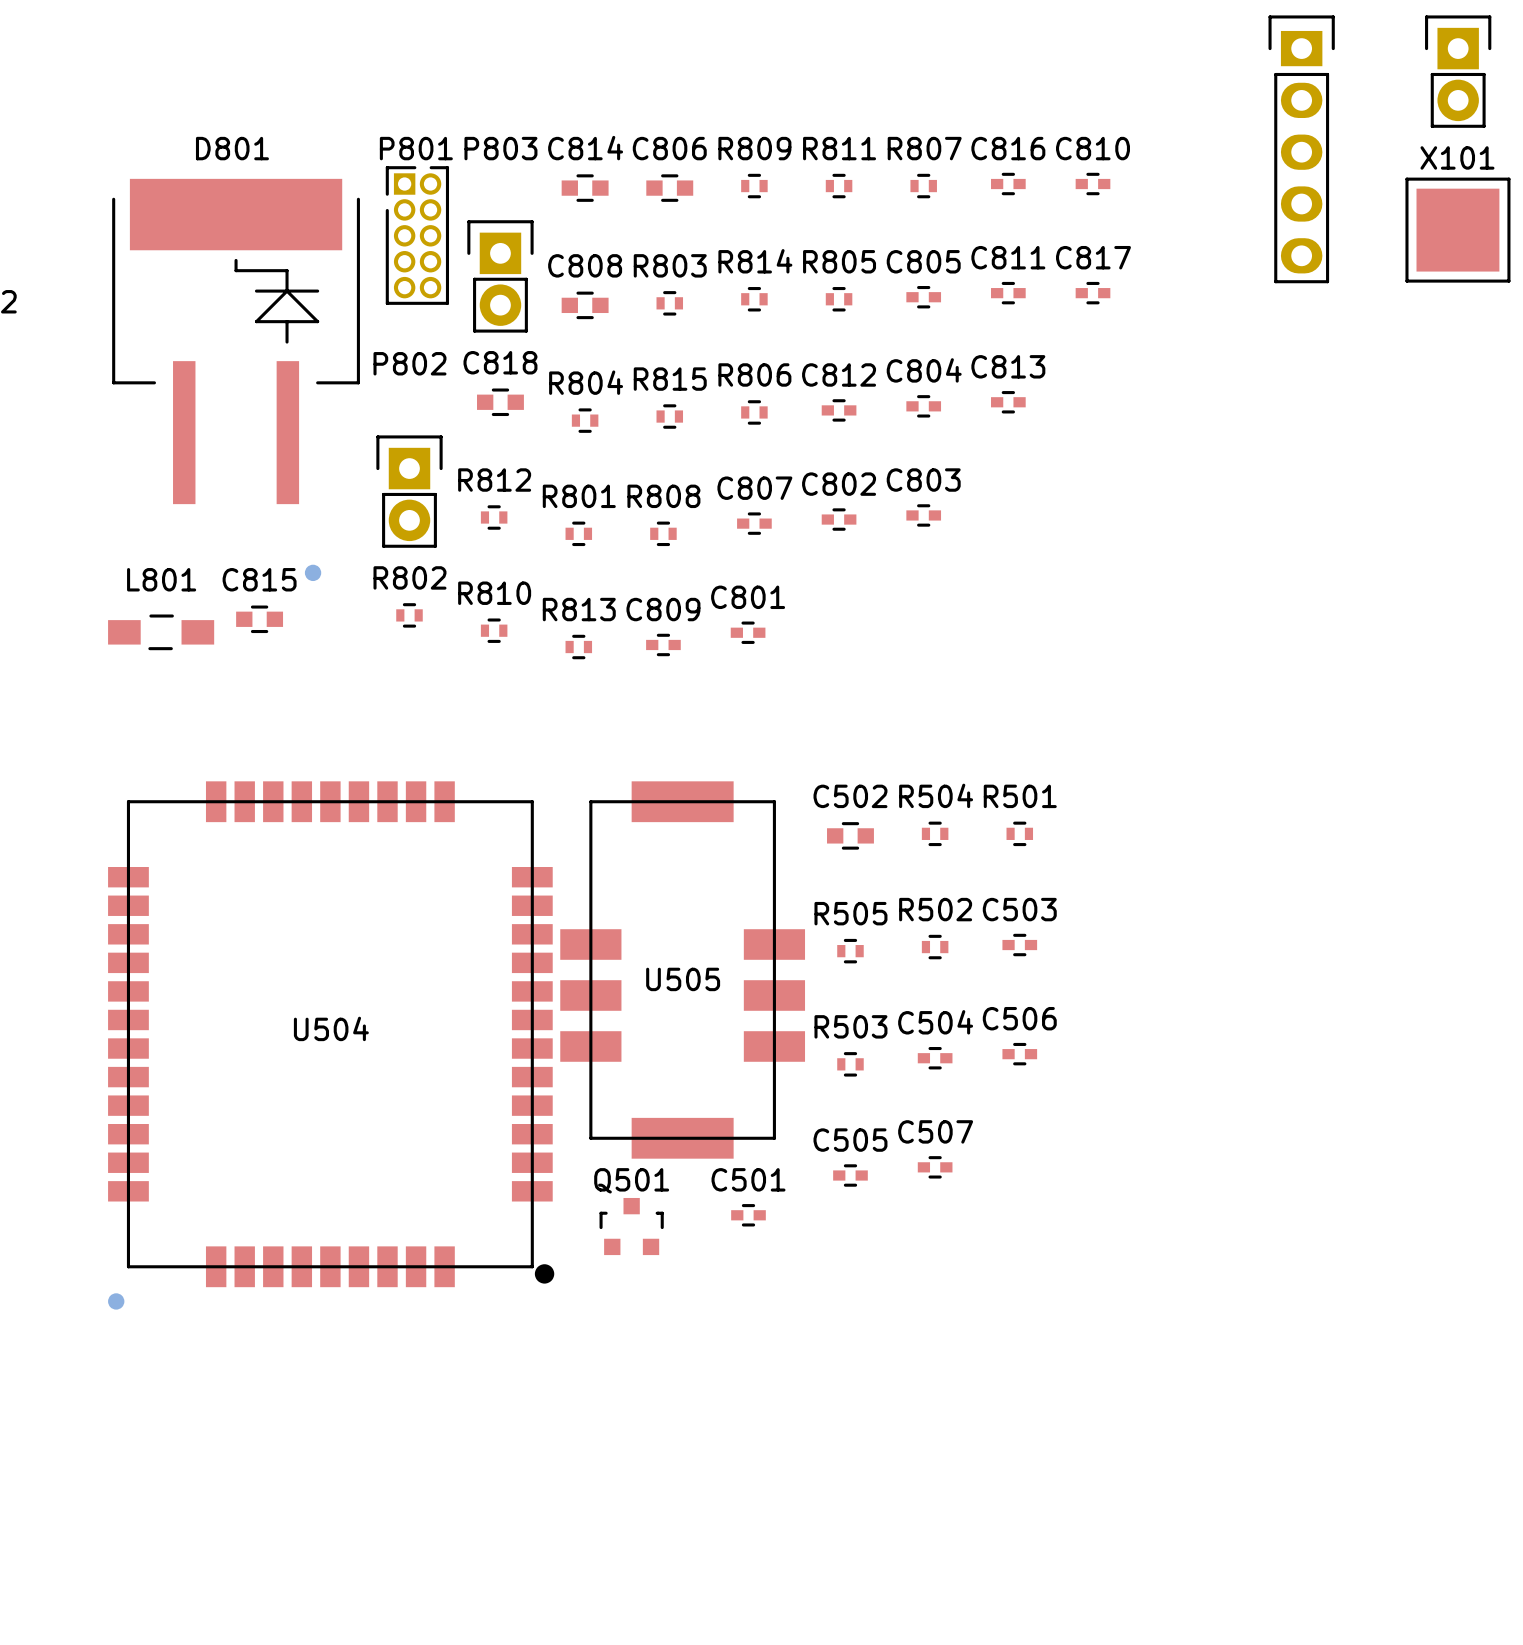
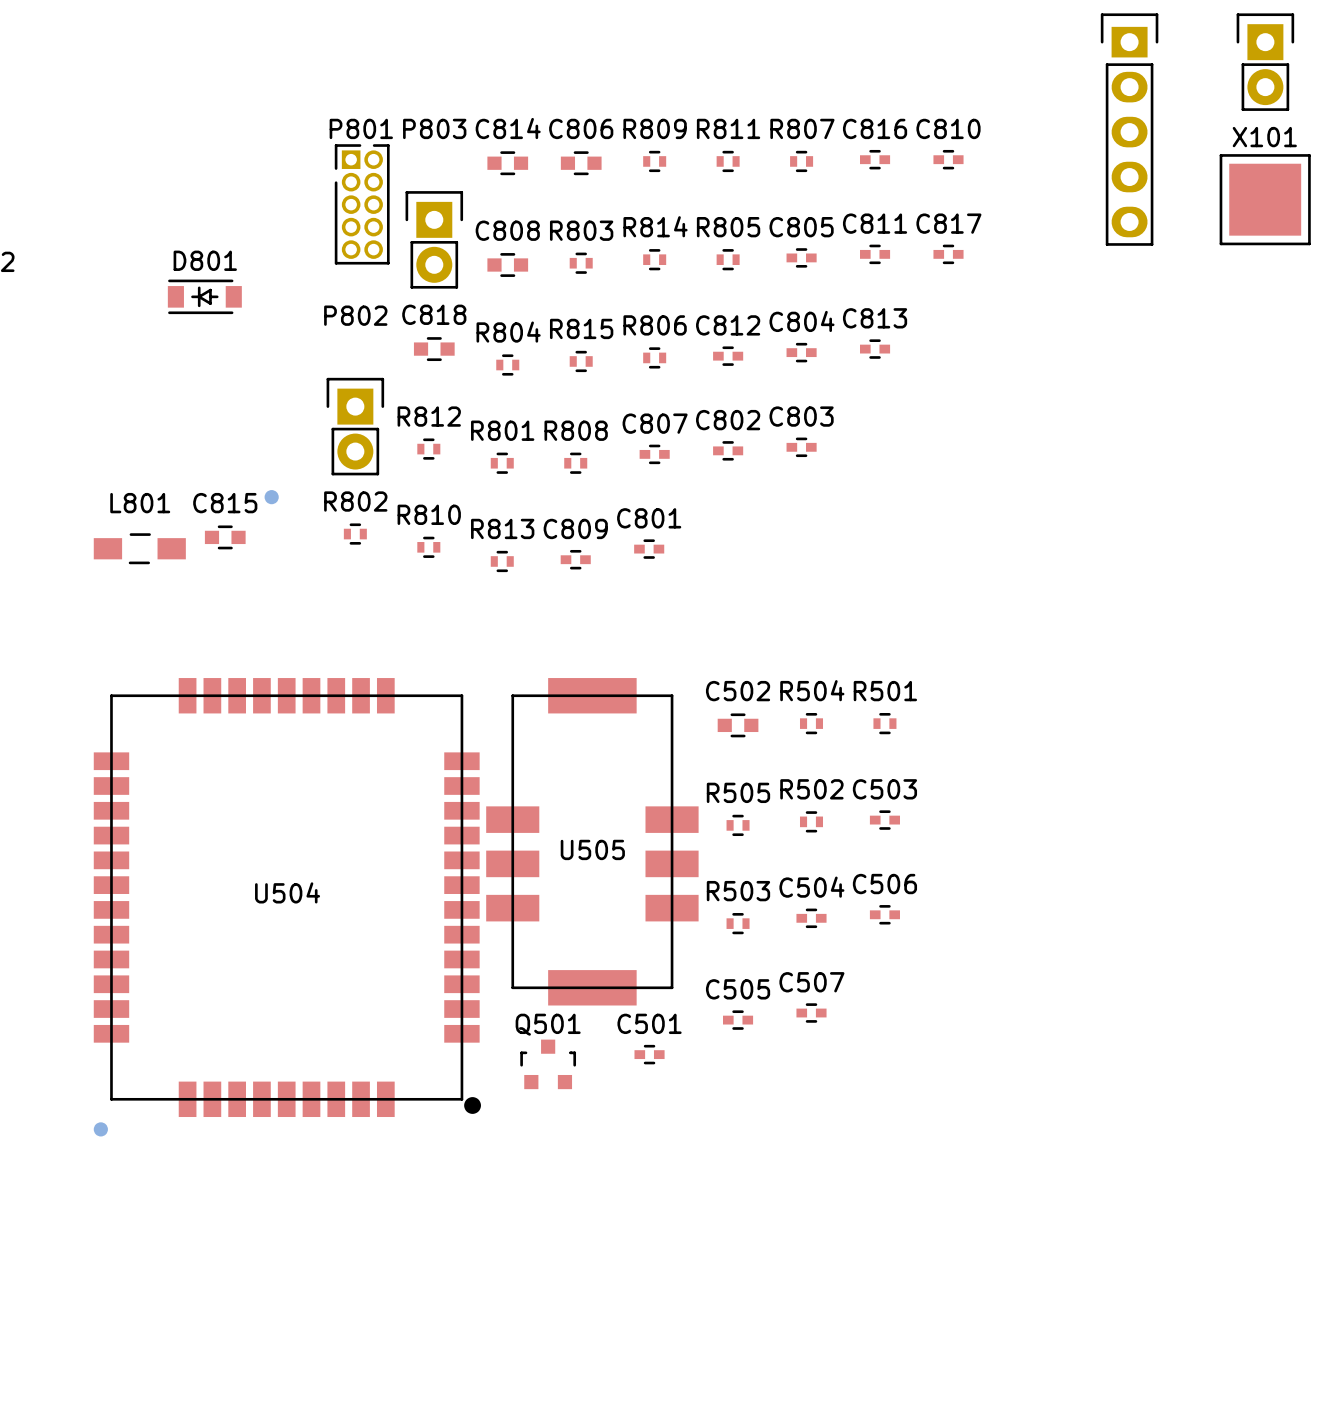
D801 name position: D801 (232, 148) -> D801 (205, 260)
D801 footprint: [112, 178, 360, 505] -> [167, 279, 242, 315]

